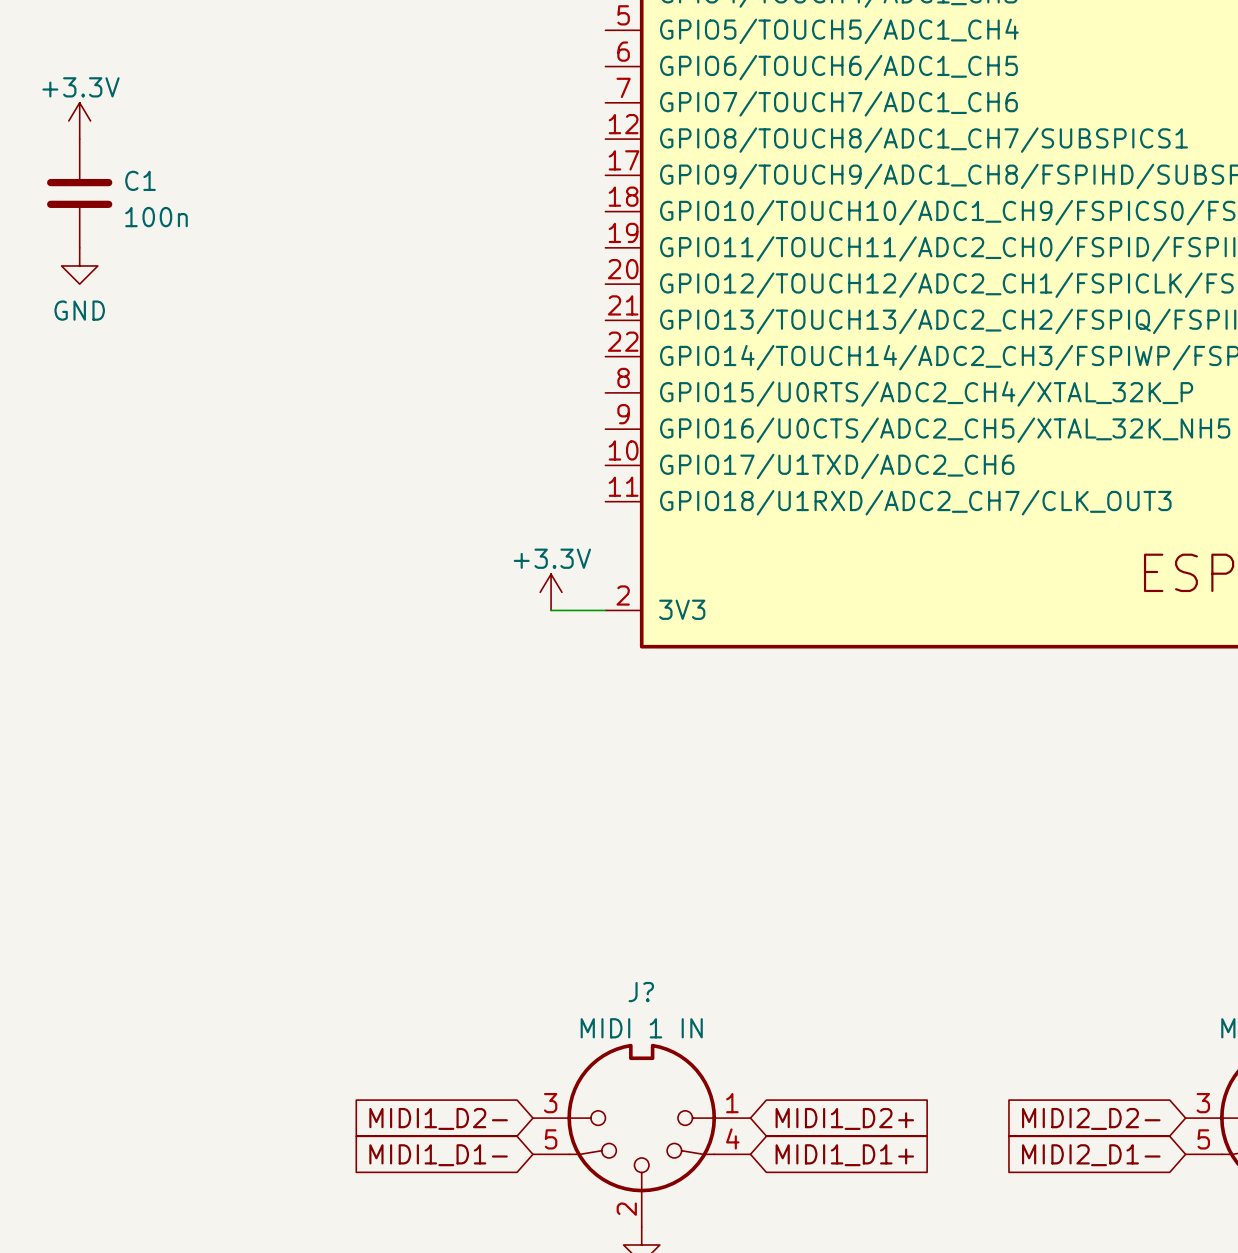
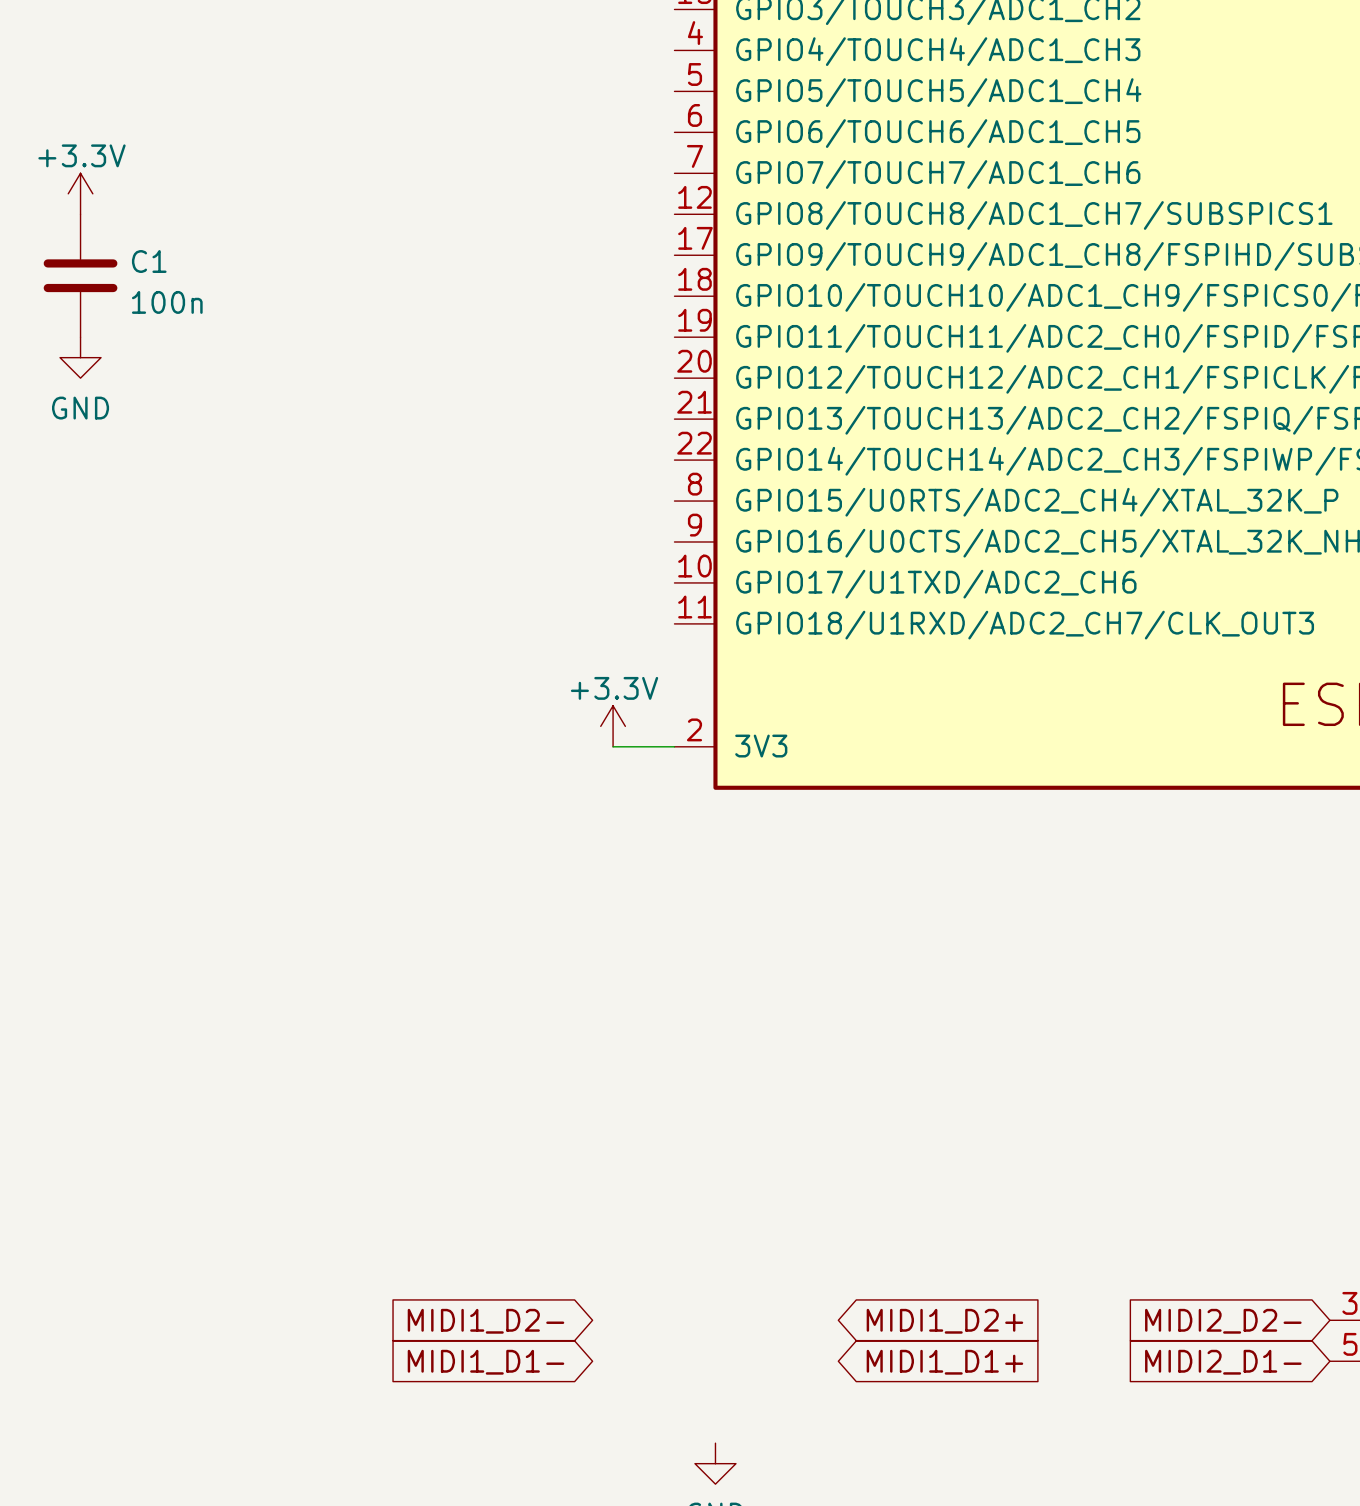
J?: MIDI 1 IN (641, 1135) -> none

